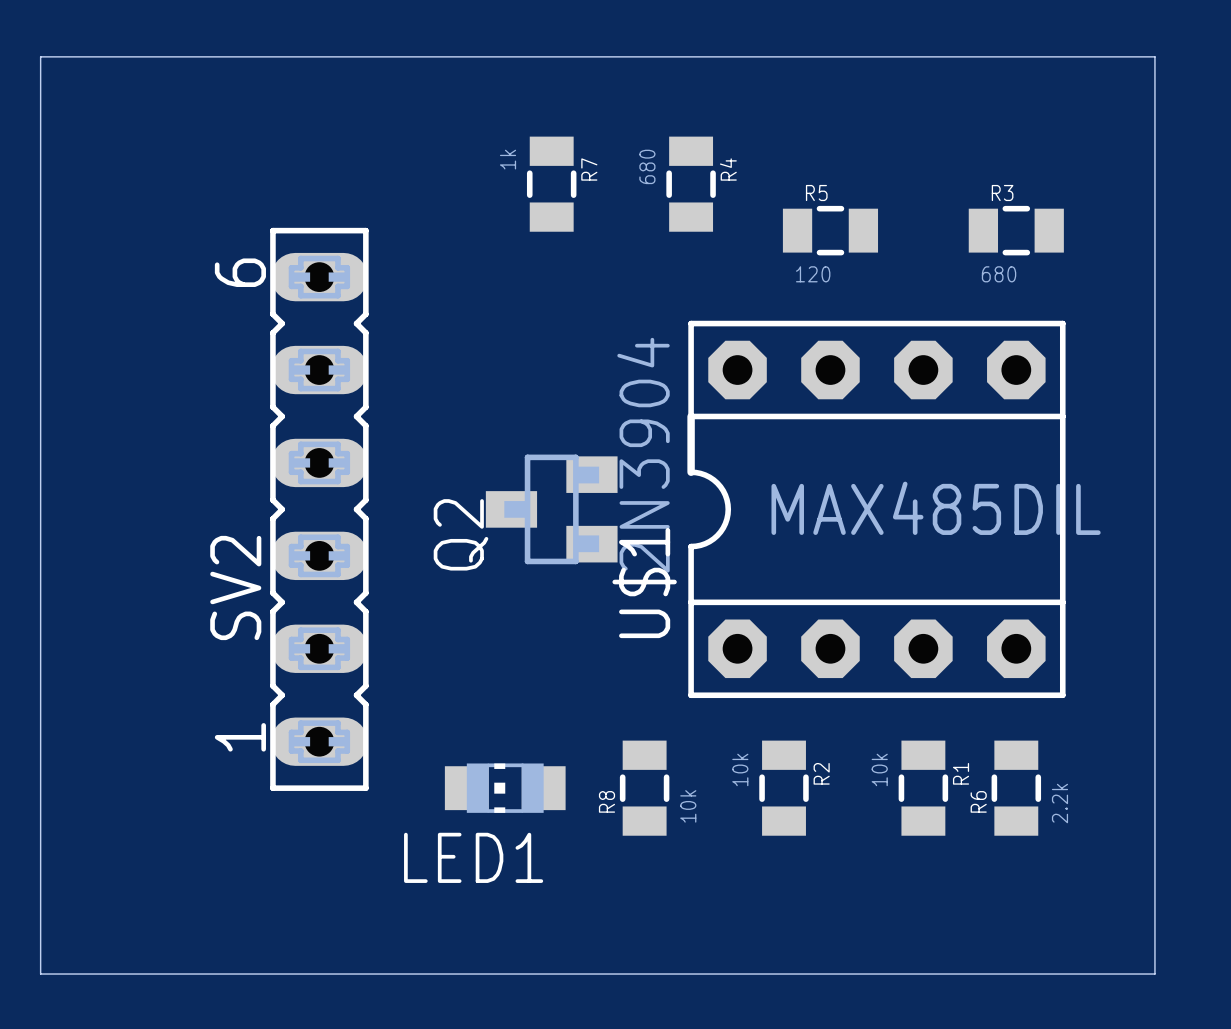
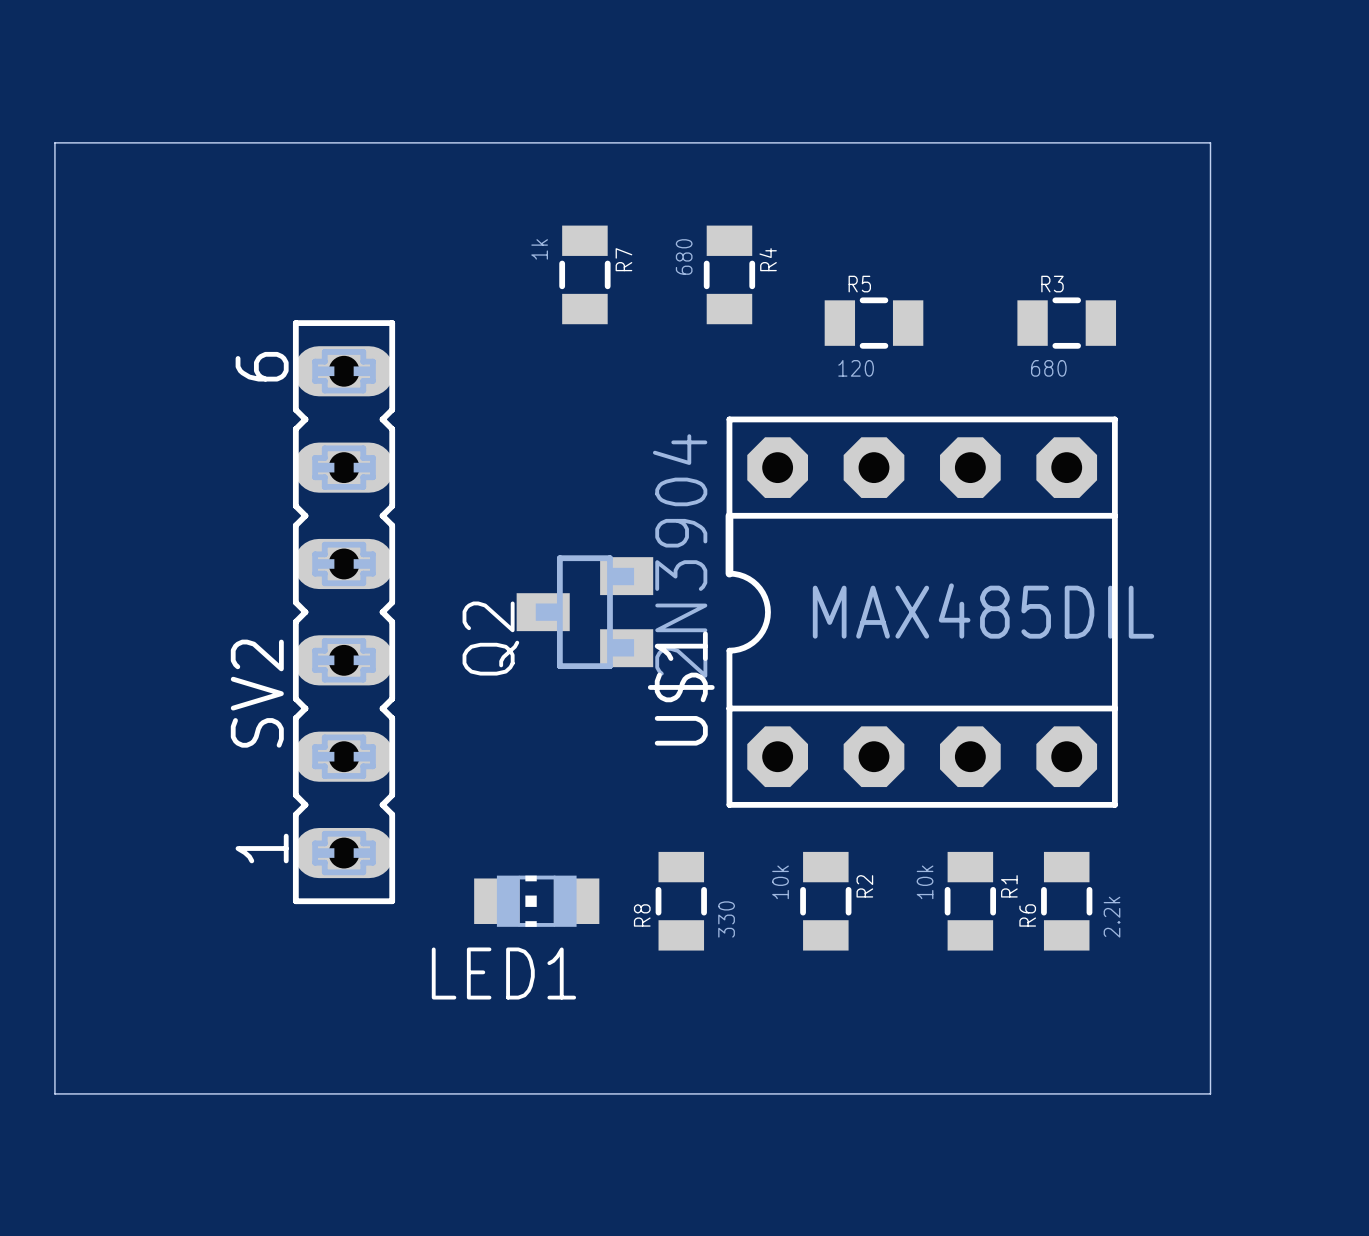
R8 value: 10k (688, 806) -> 330 (726, 919)

